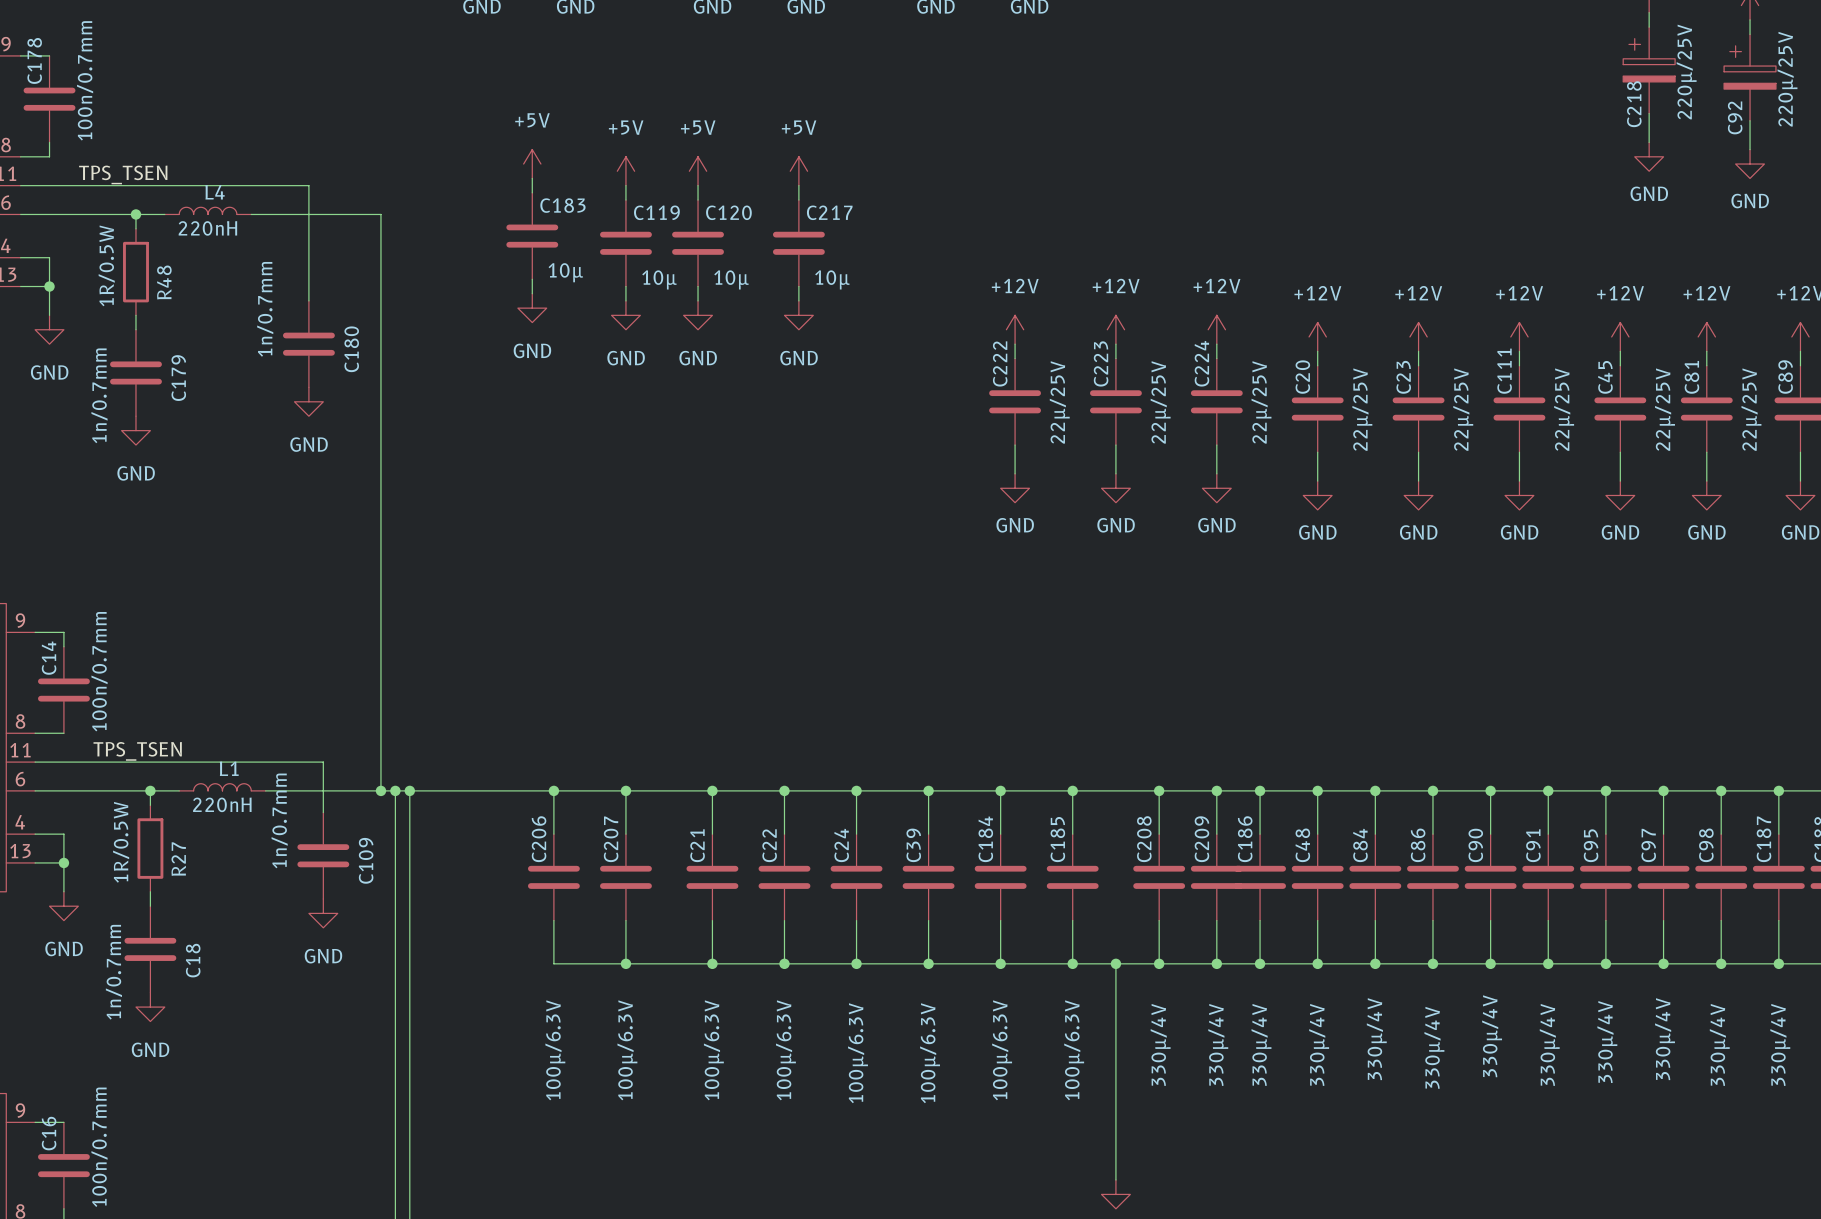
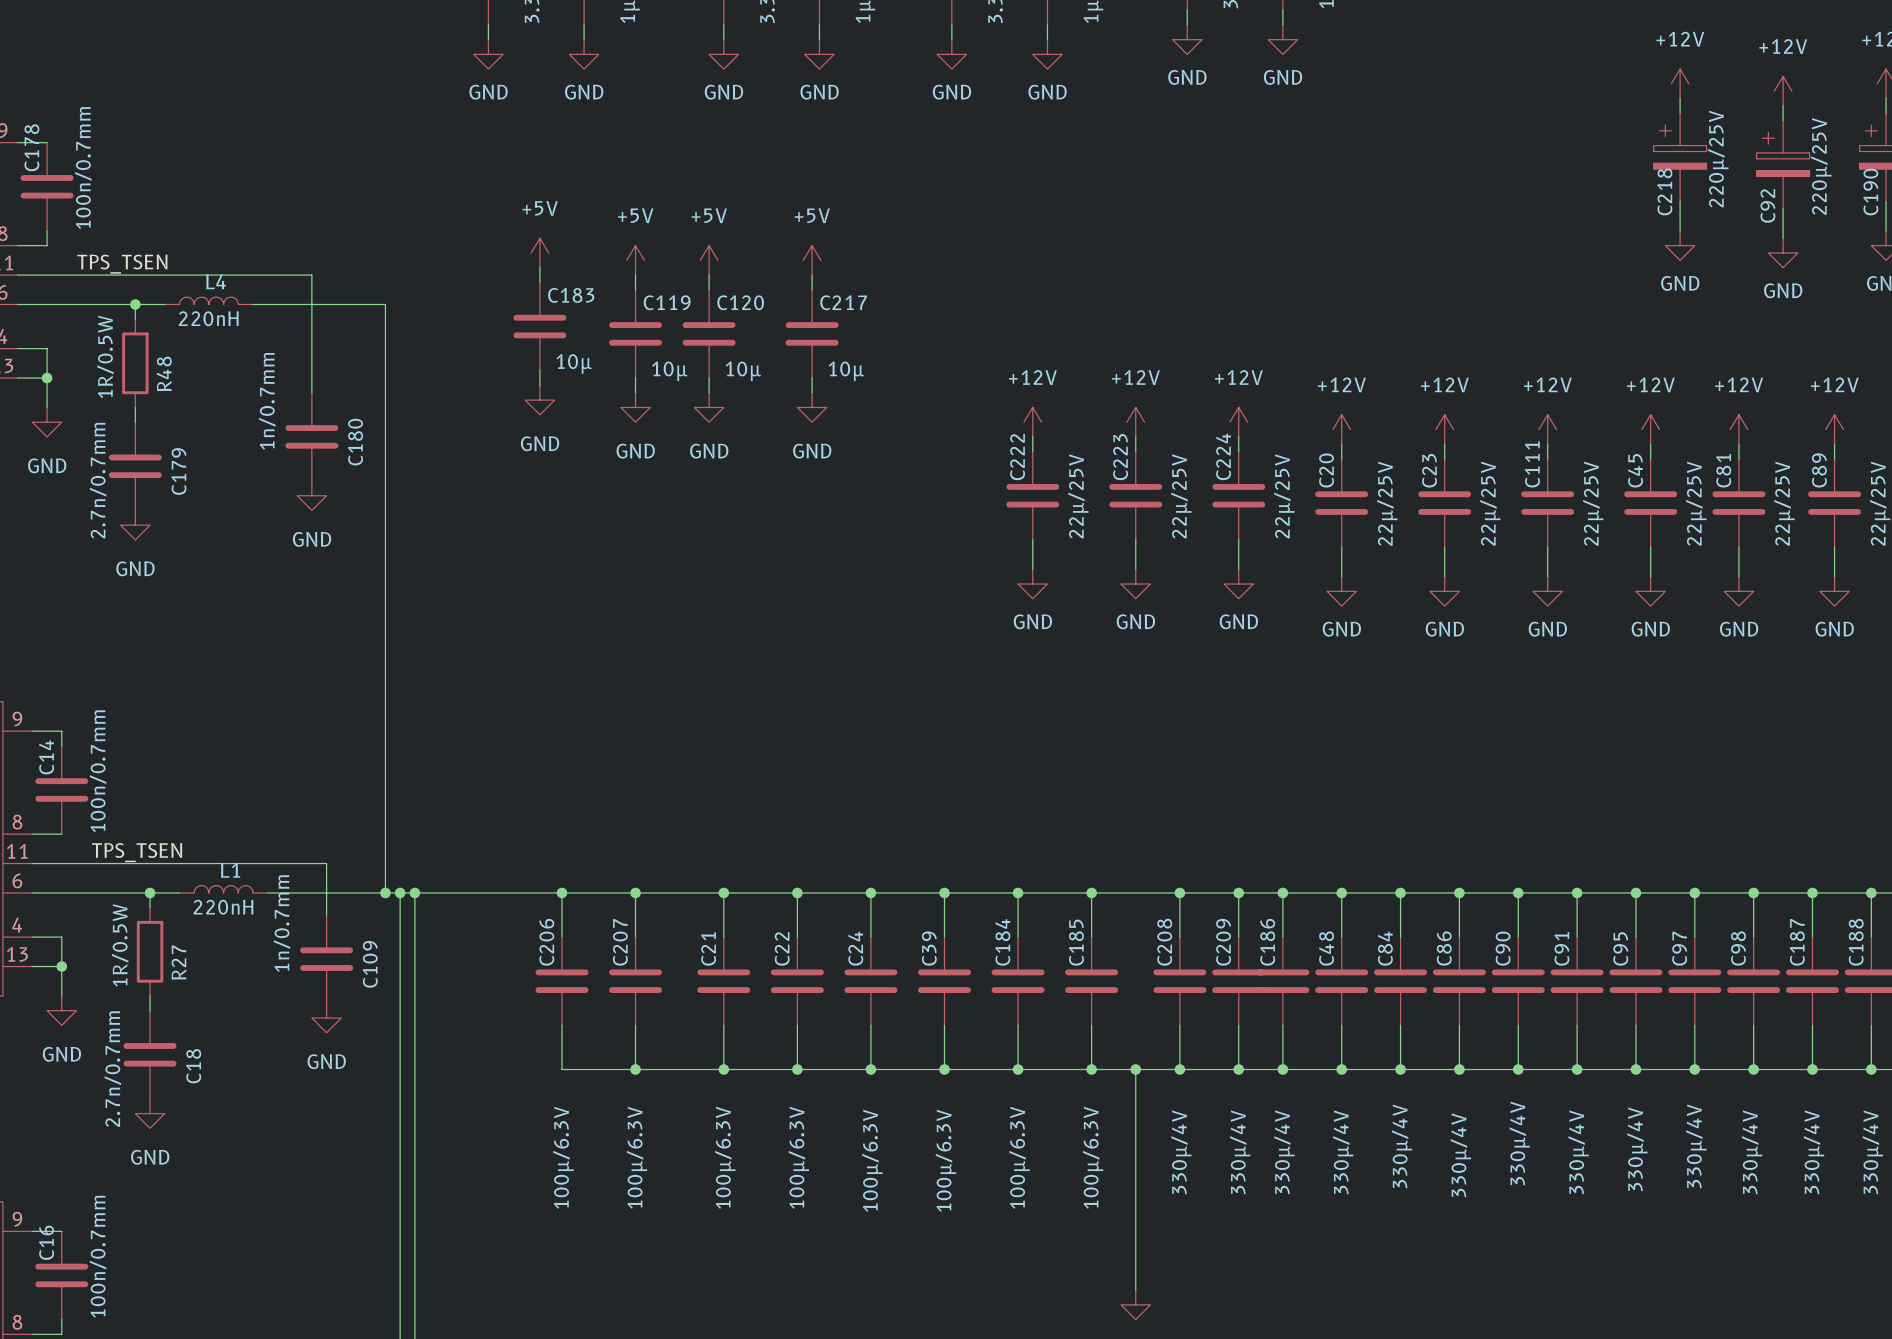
C179 value: 1n/0.7mm (99, 395) -> 2.7n/0.7mm (98, 480)
C18 value: 1n/0.7mm (113, 972) -> 2.7n/0.7mm (112, 1069)

